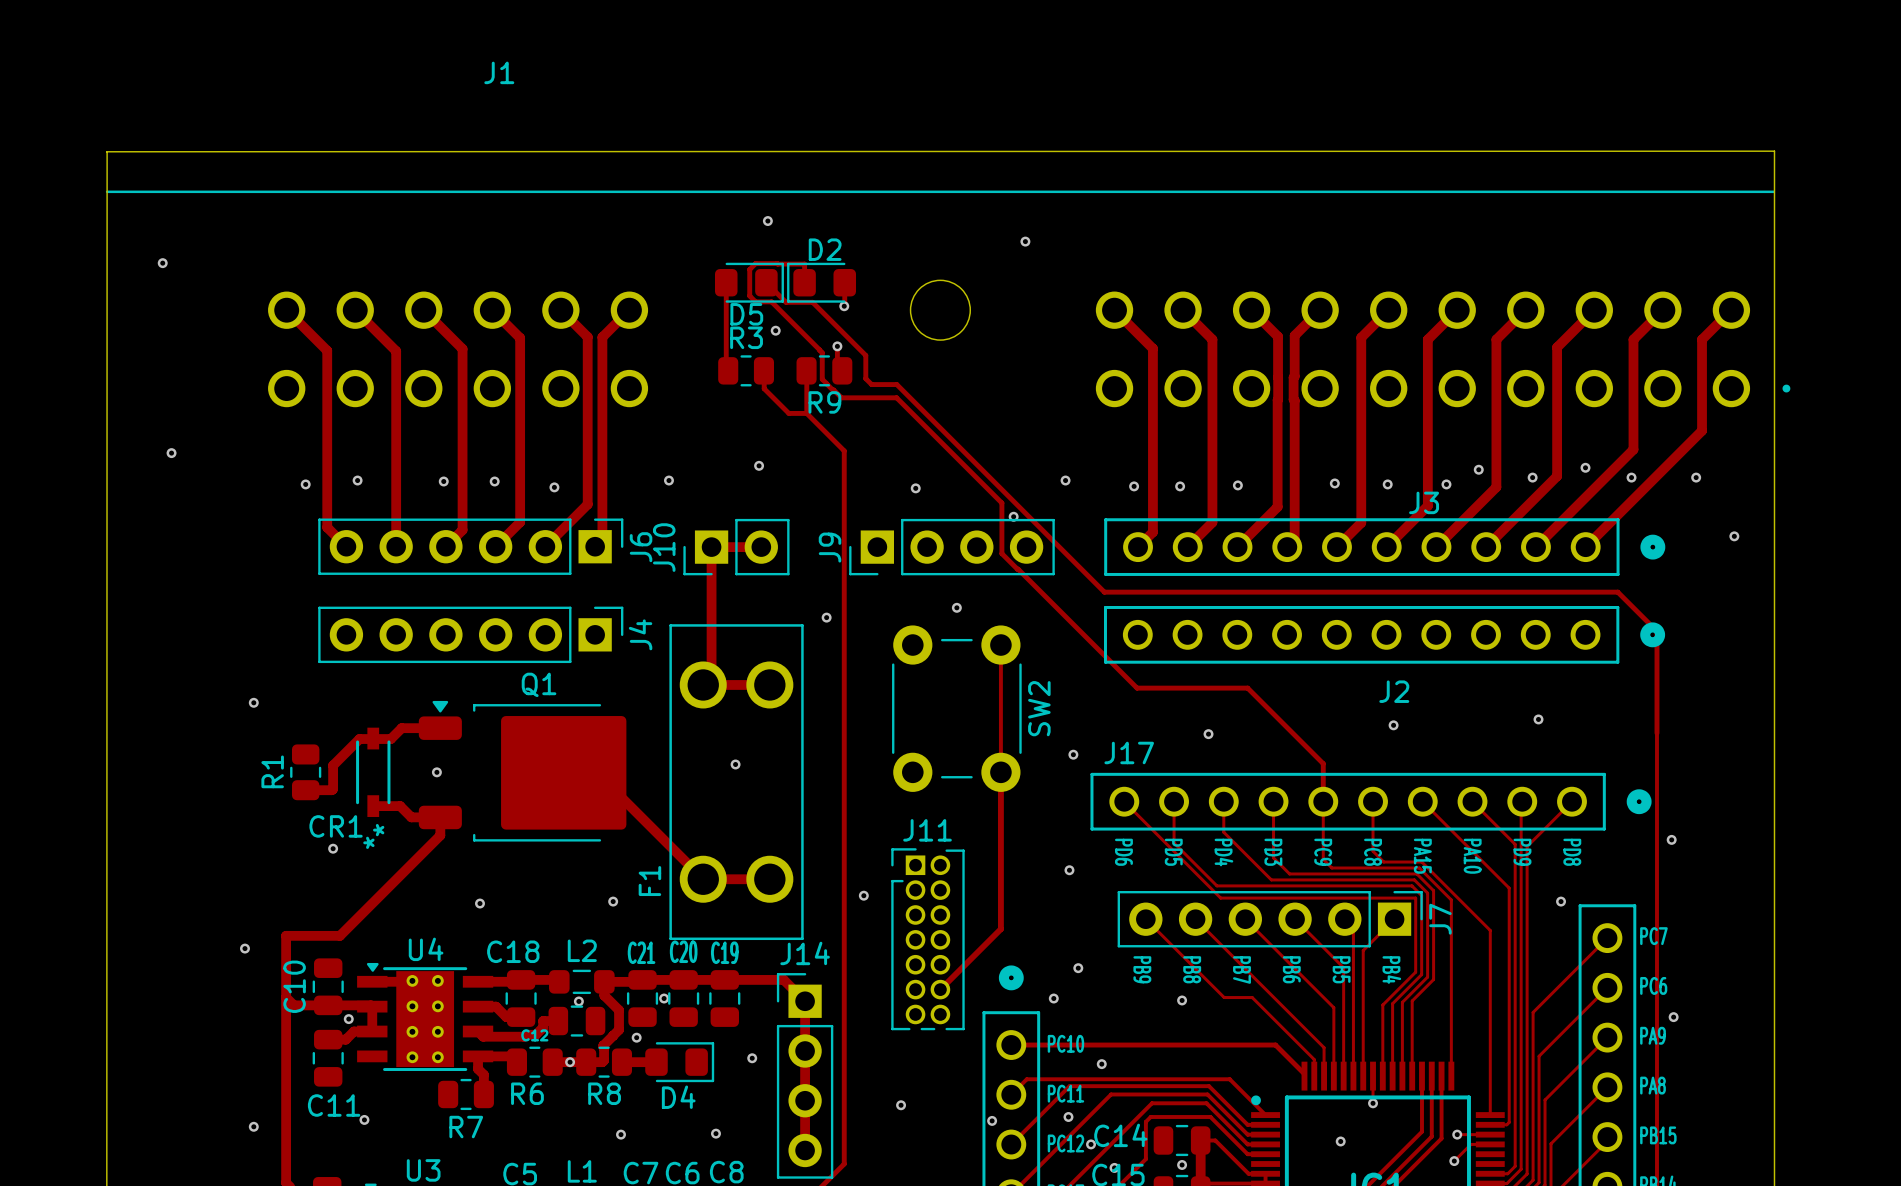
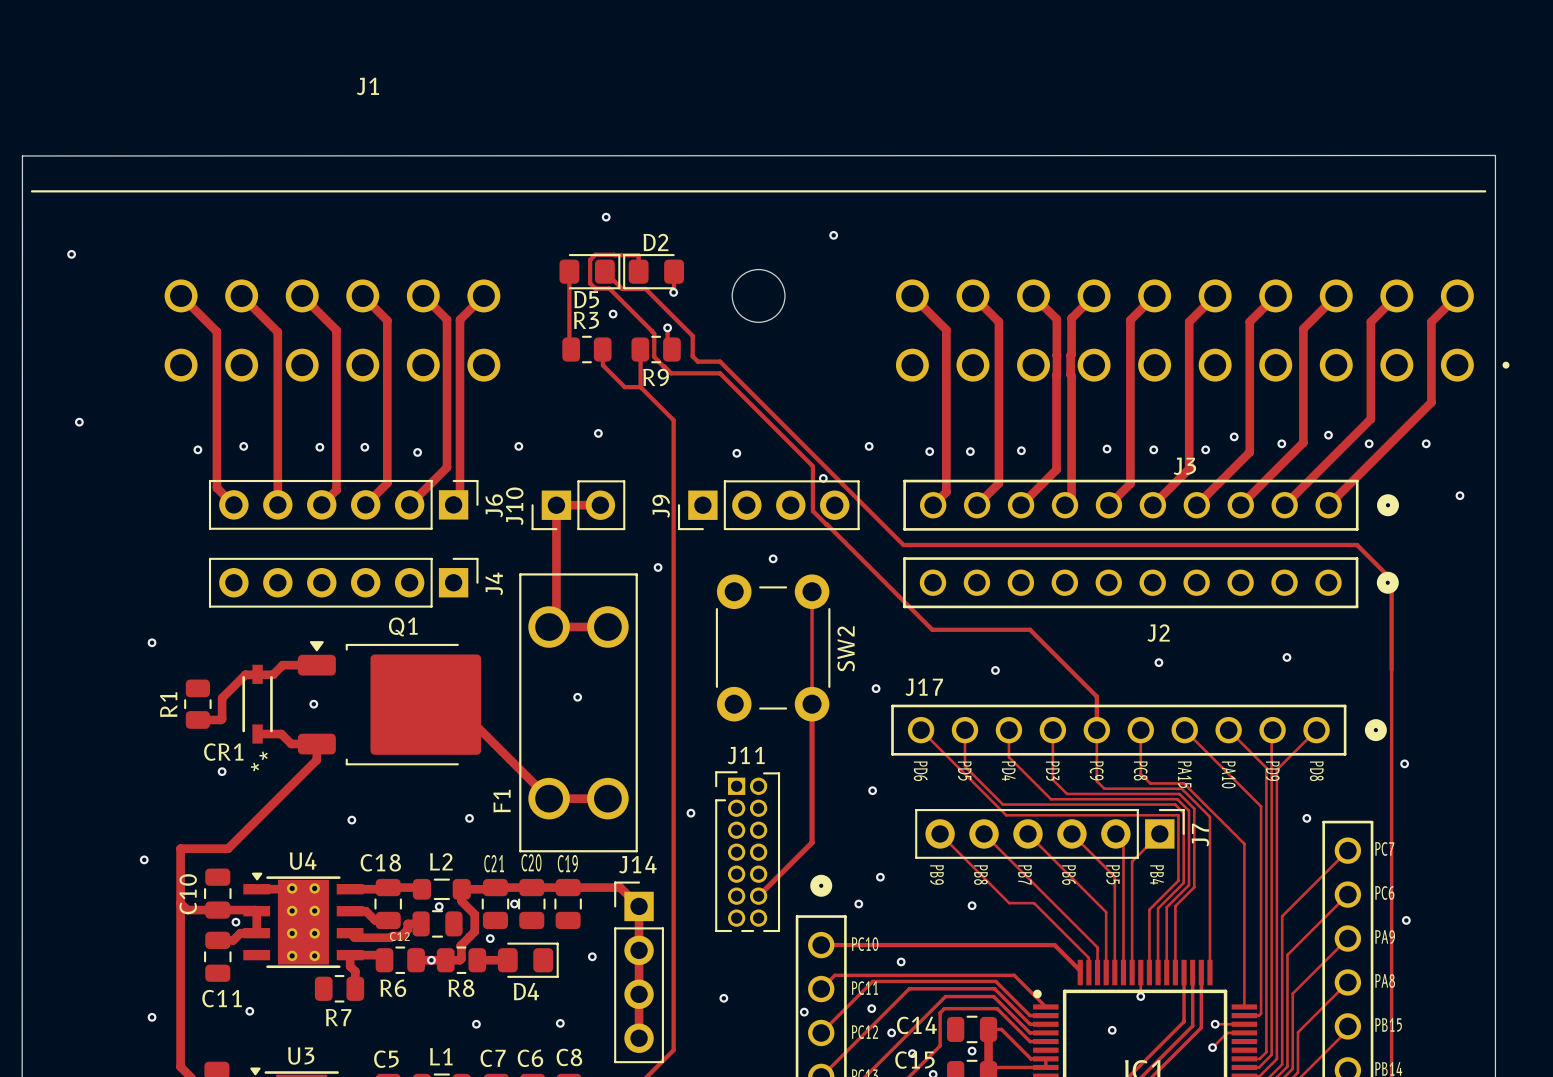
J1 footprint: [105, 190, 1791, 408] -> [30, 190, 1510, 382]

